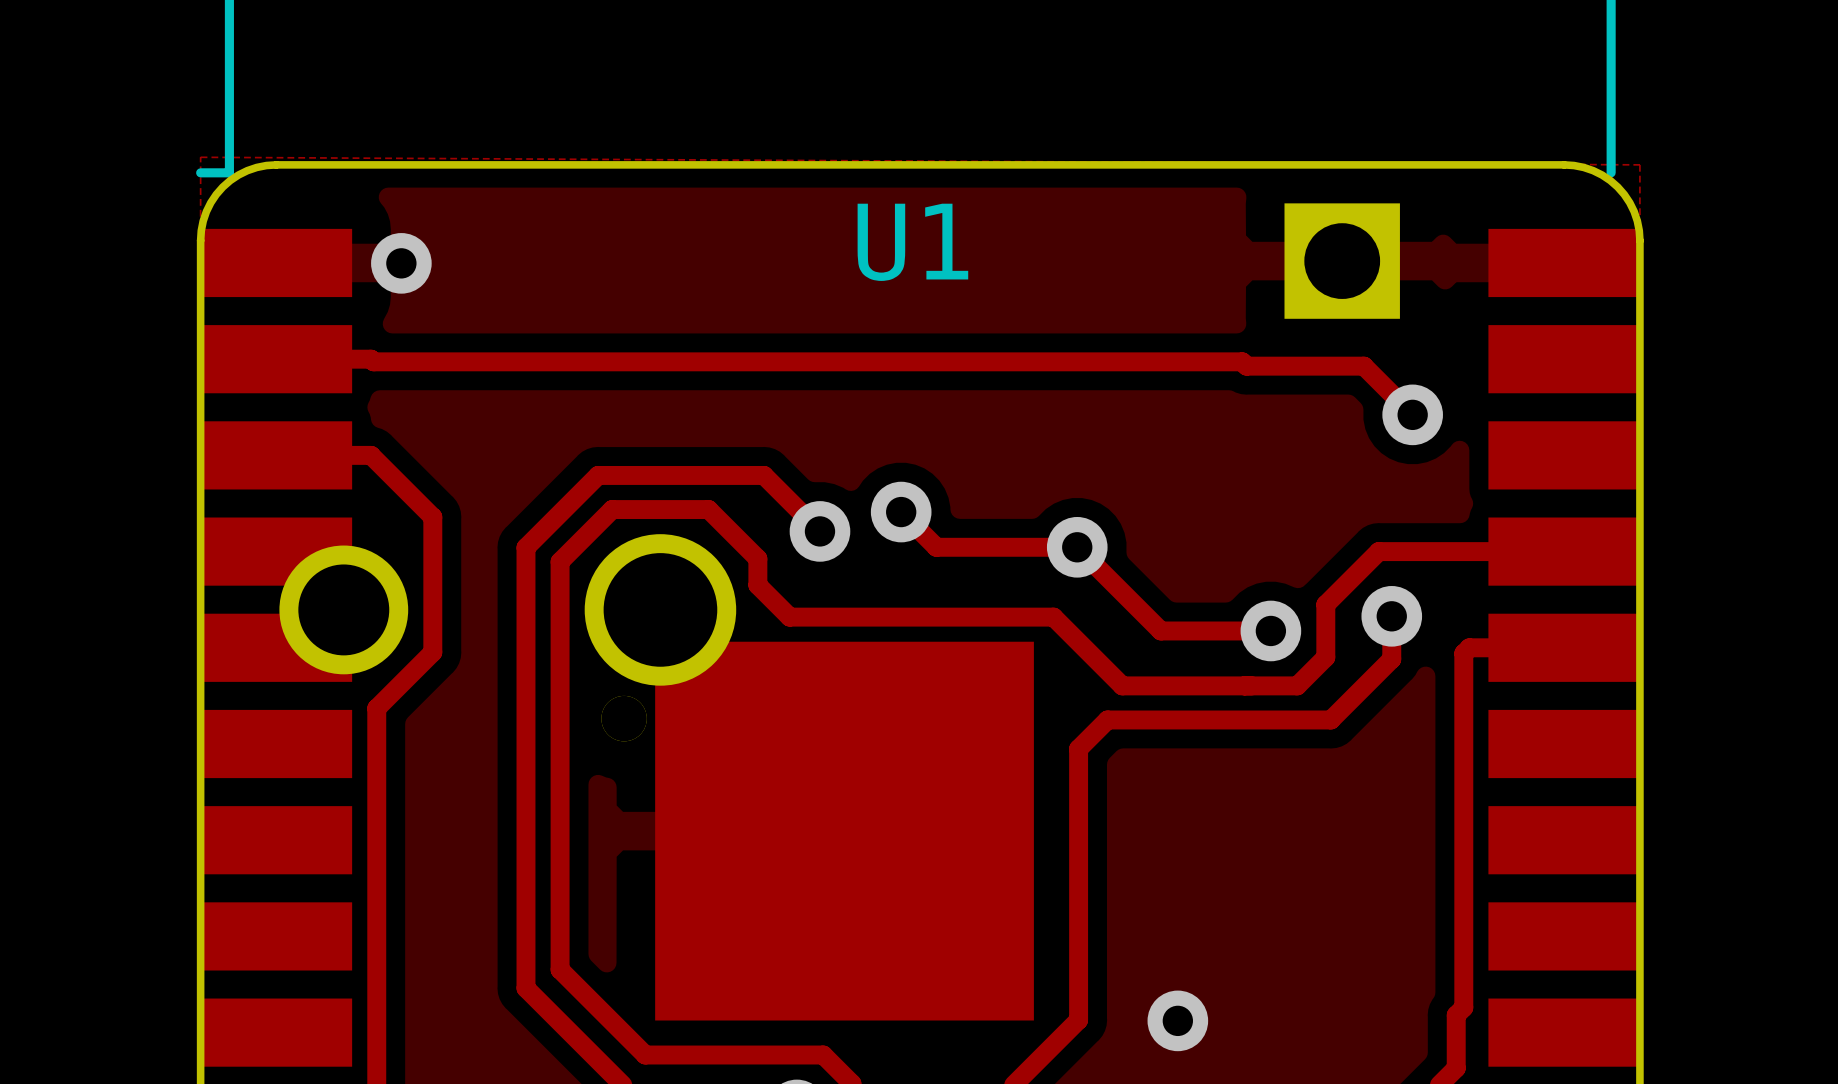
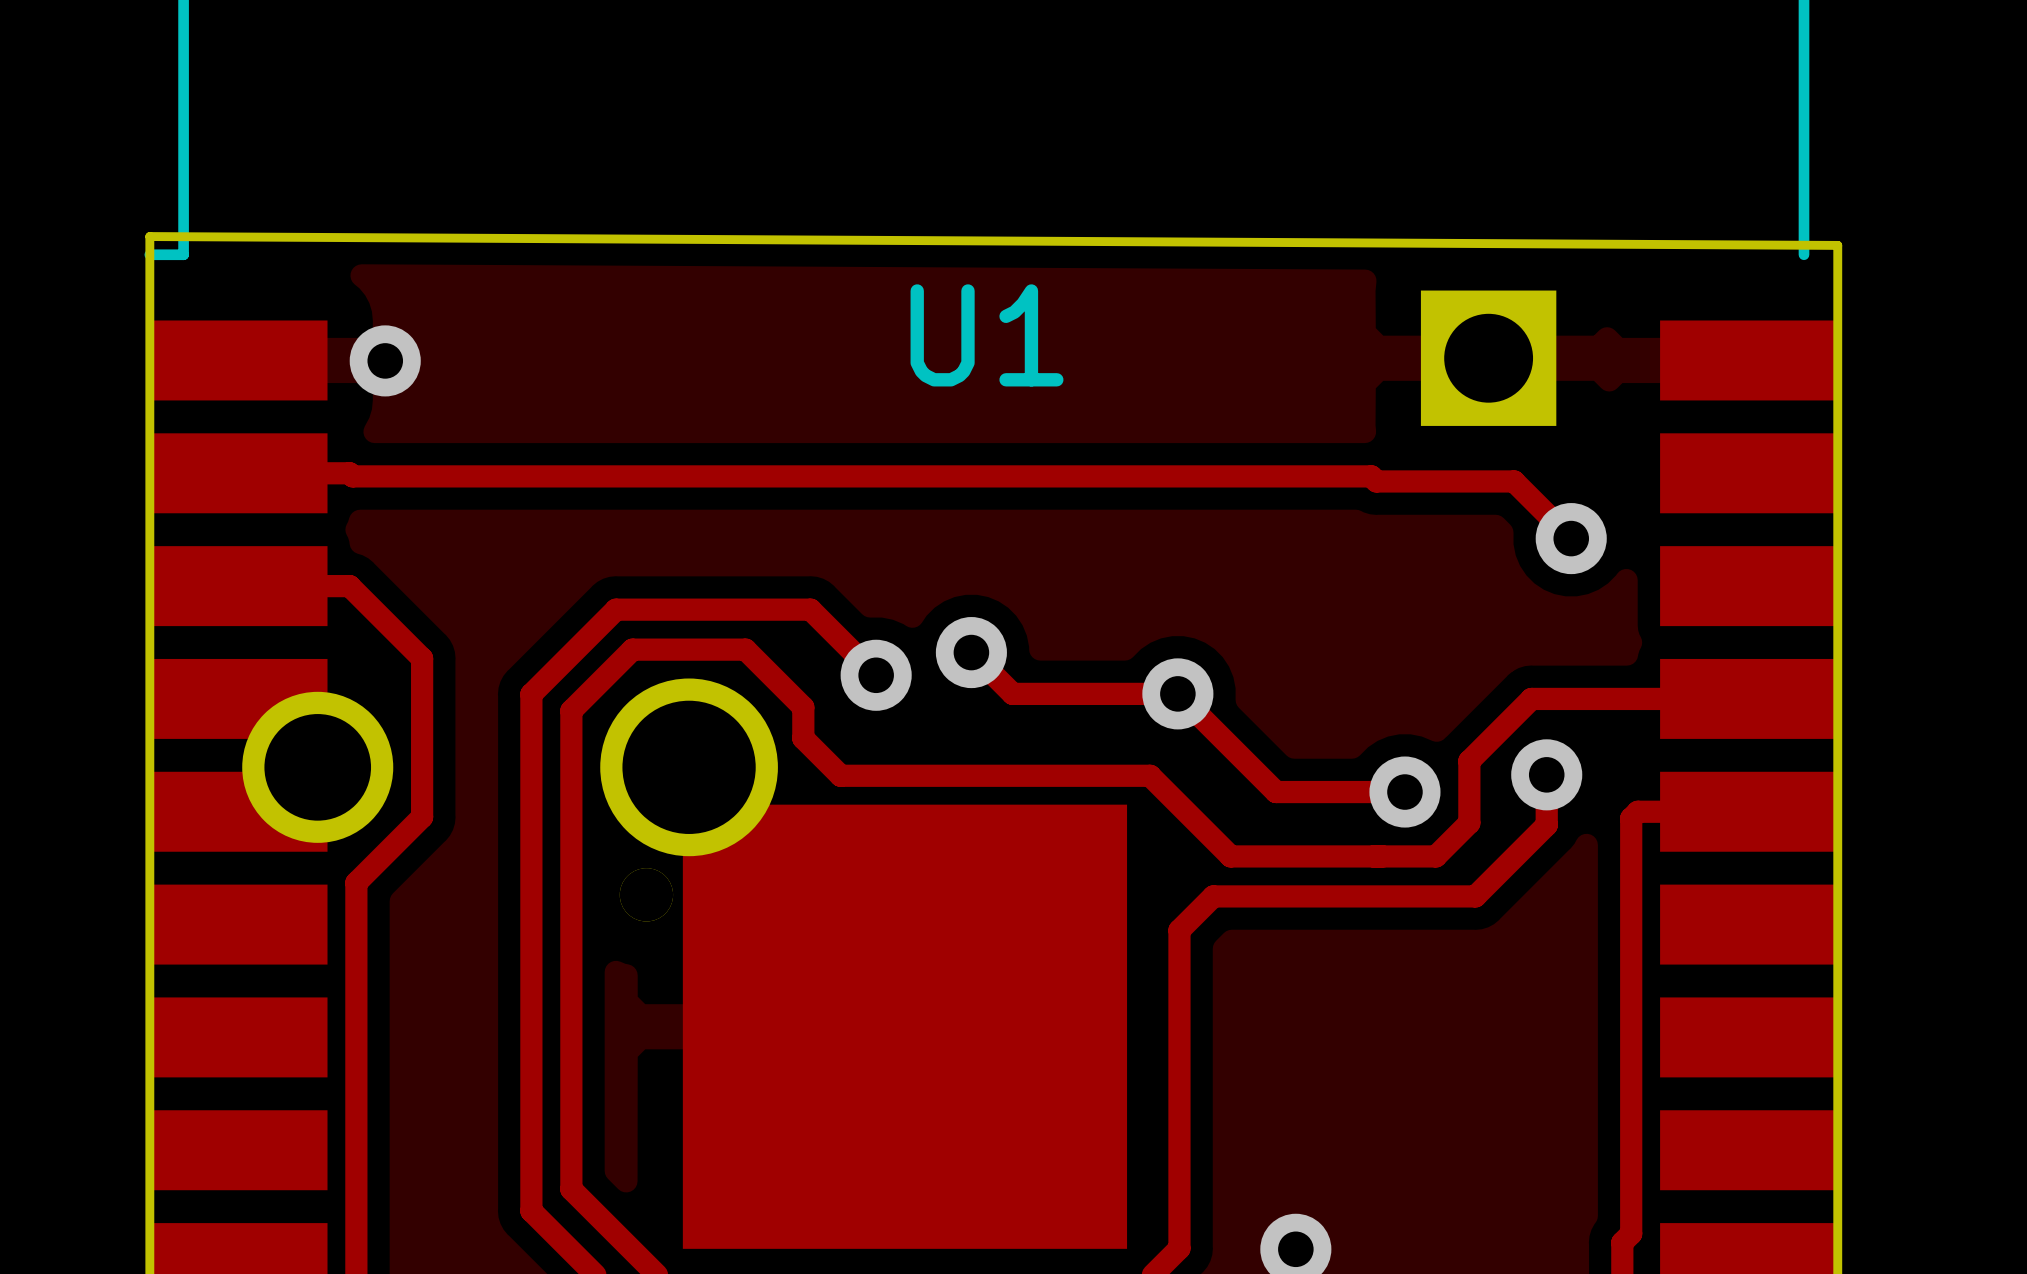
board edge: (200, 240) (206, 211) (222, 187) (247, 170) (276, 164) (1564, 164) (1593, 170) (1617, 187) (1634, 211) (1639, 240) -> (149, 334) (149, 236) (1837, 245) (1837, 334)

